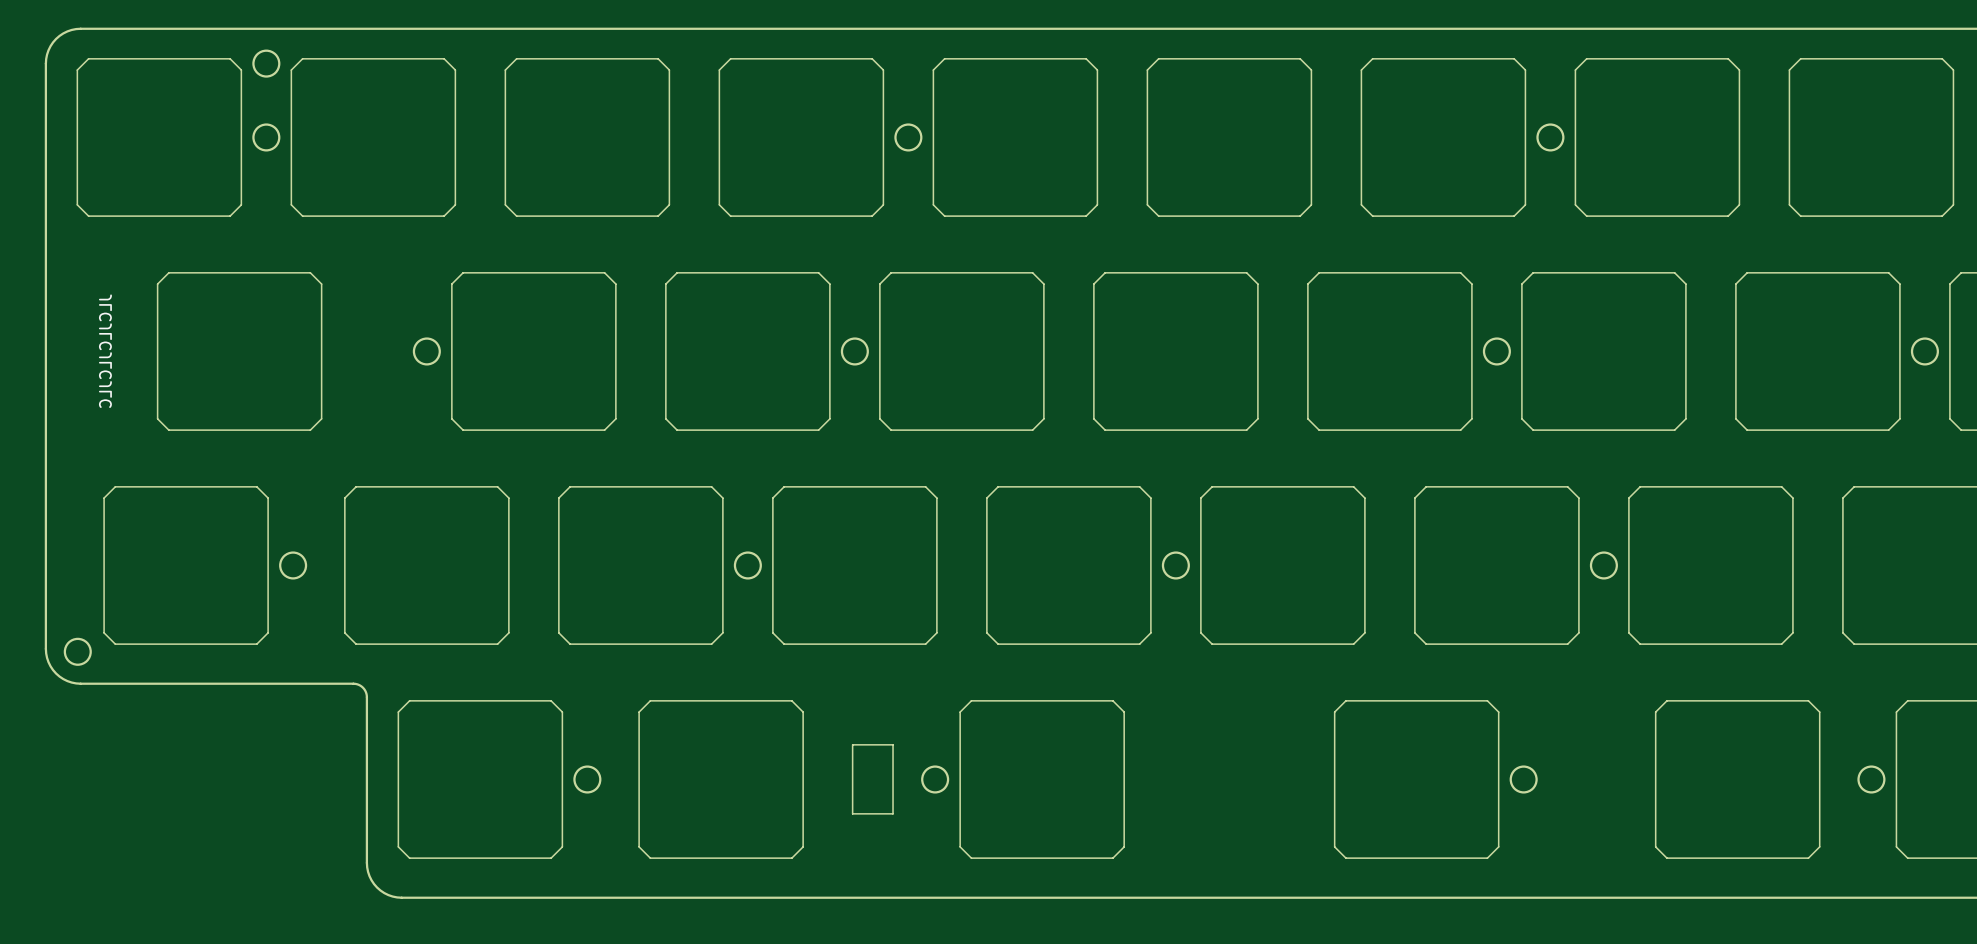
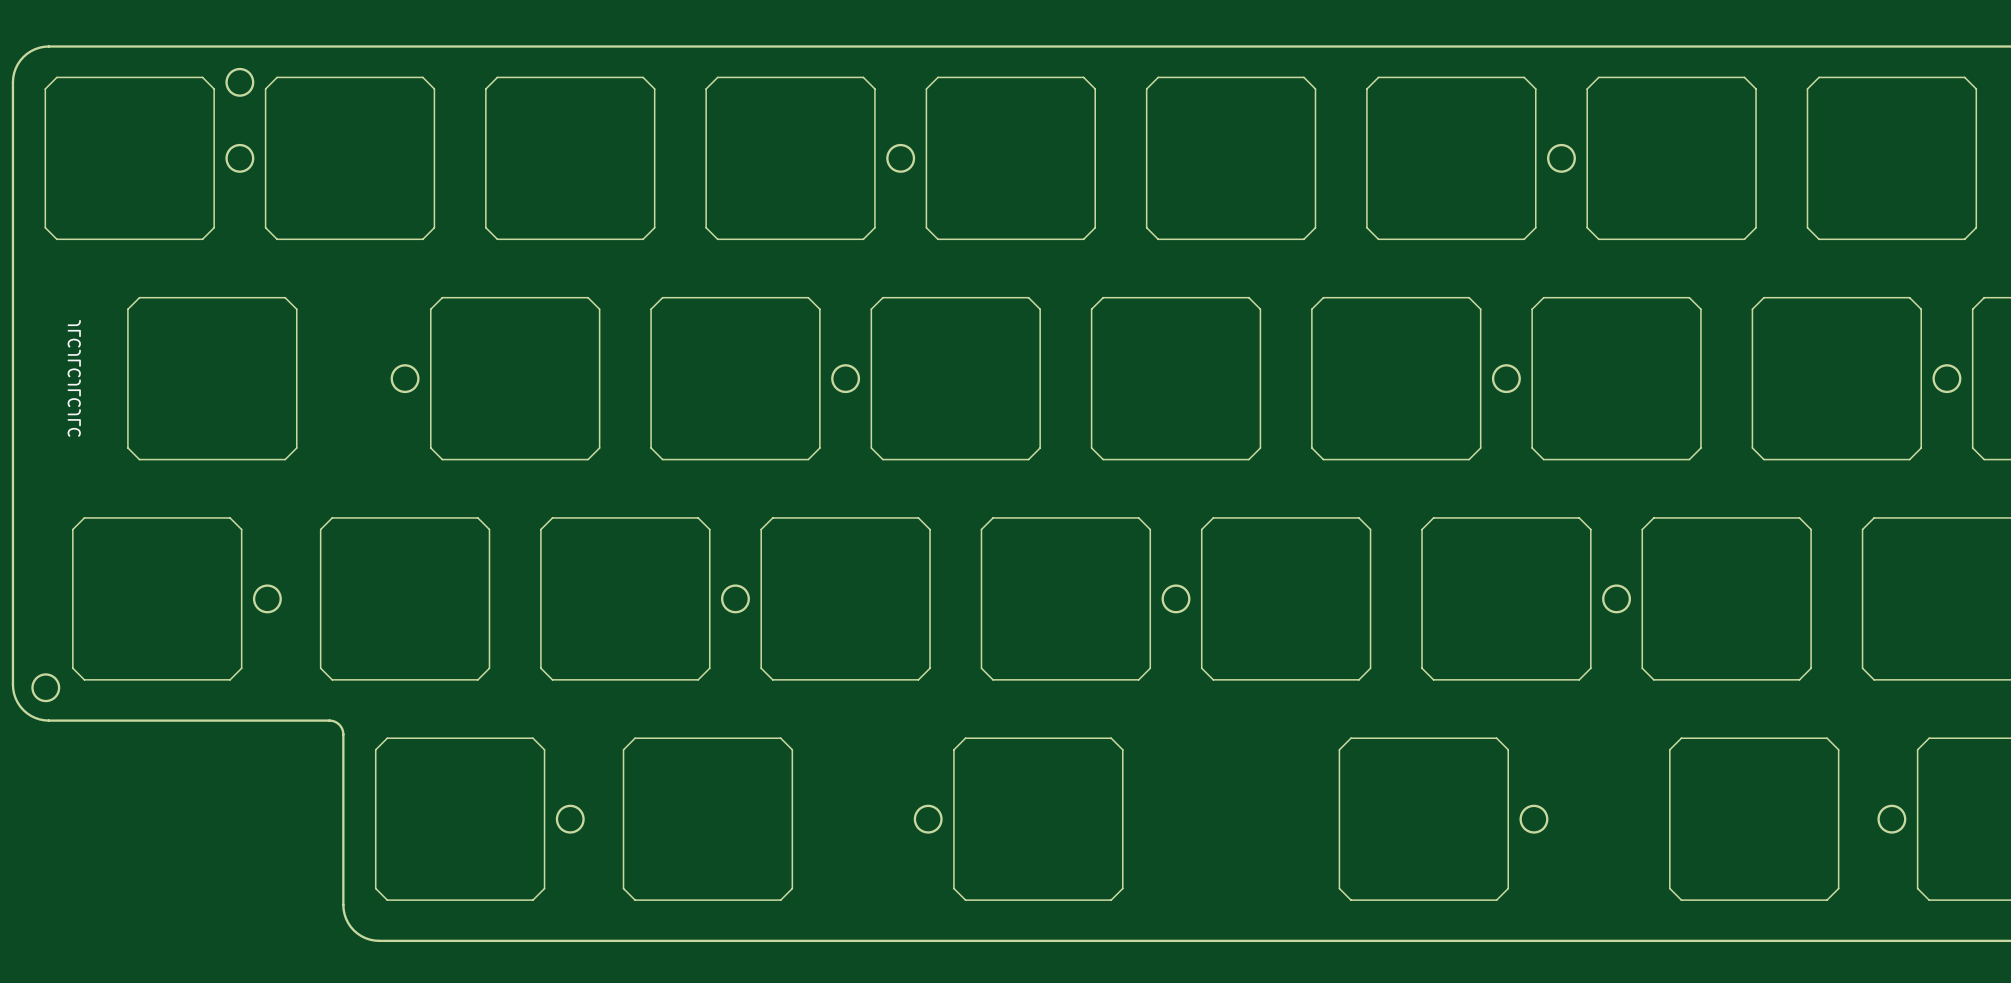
board edge: (893, 744) (852, 744) (852, 813) (893, 813) (893, 744) -> none

